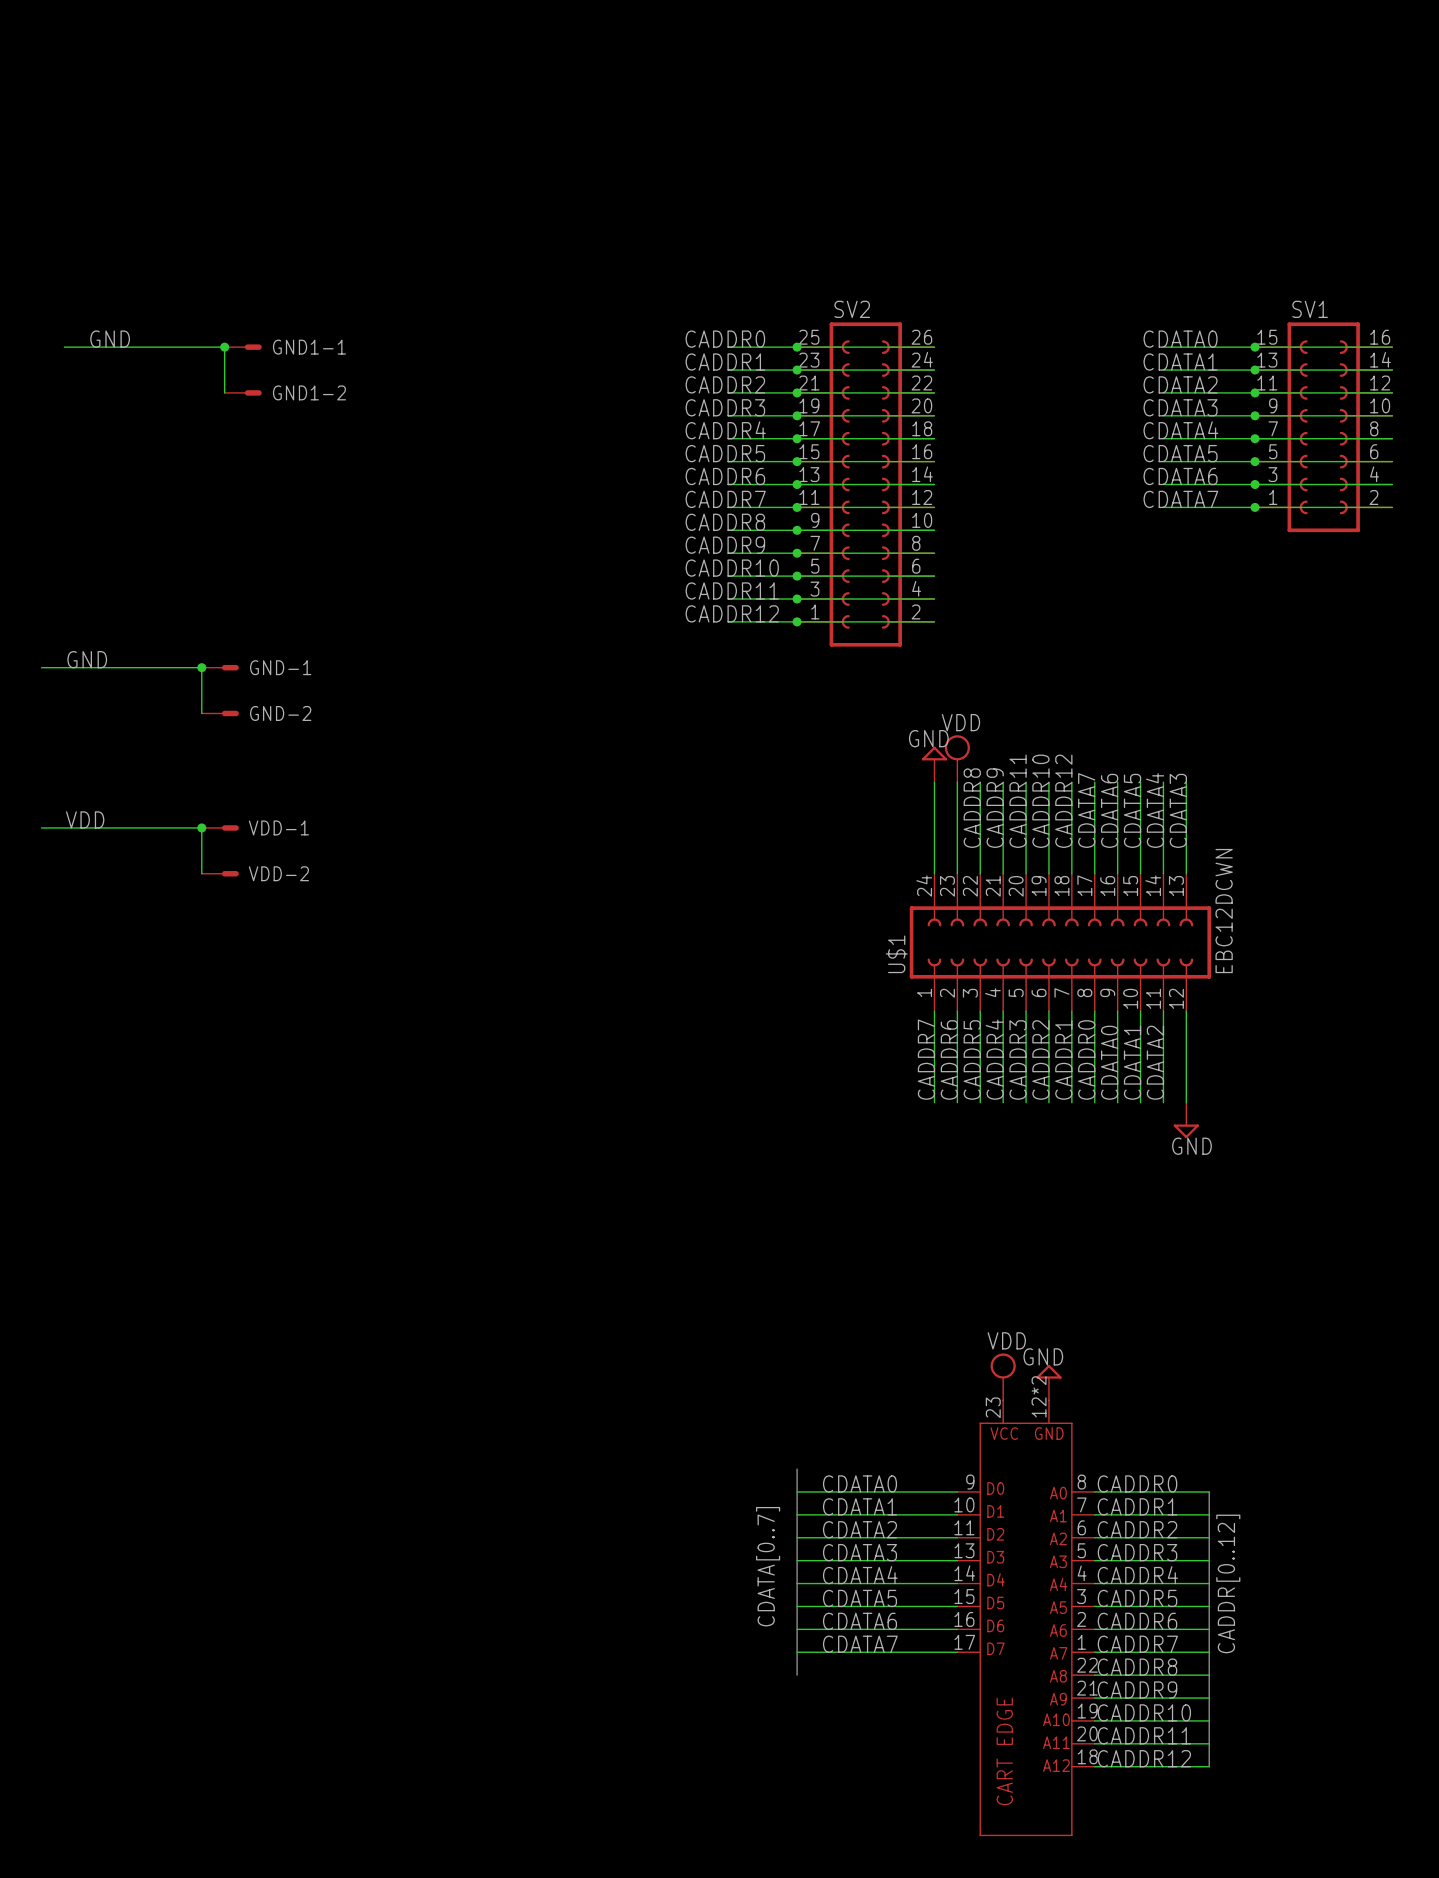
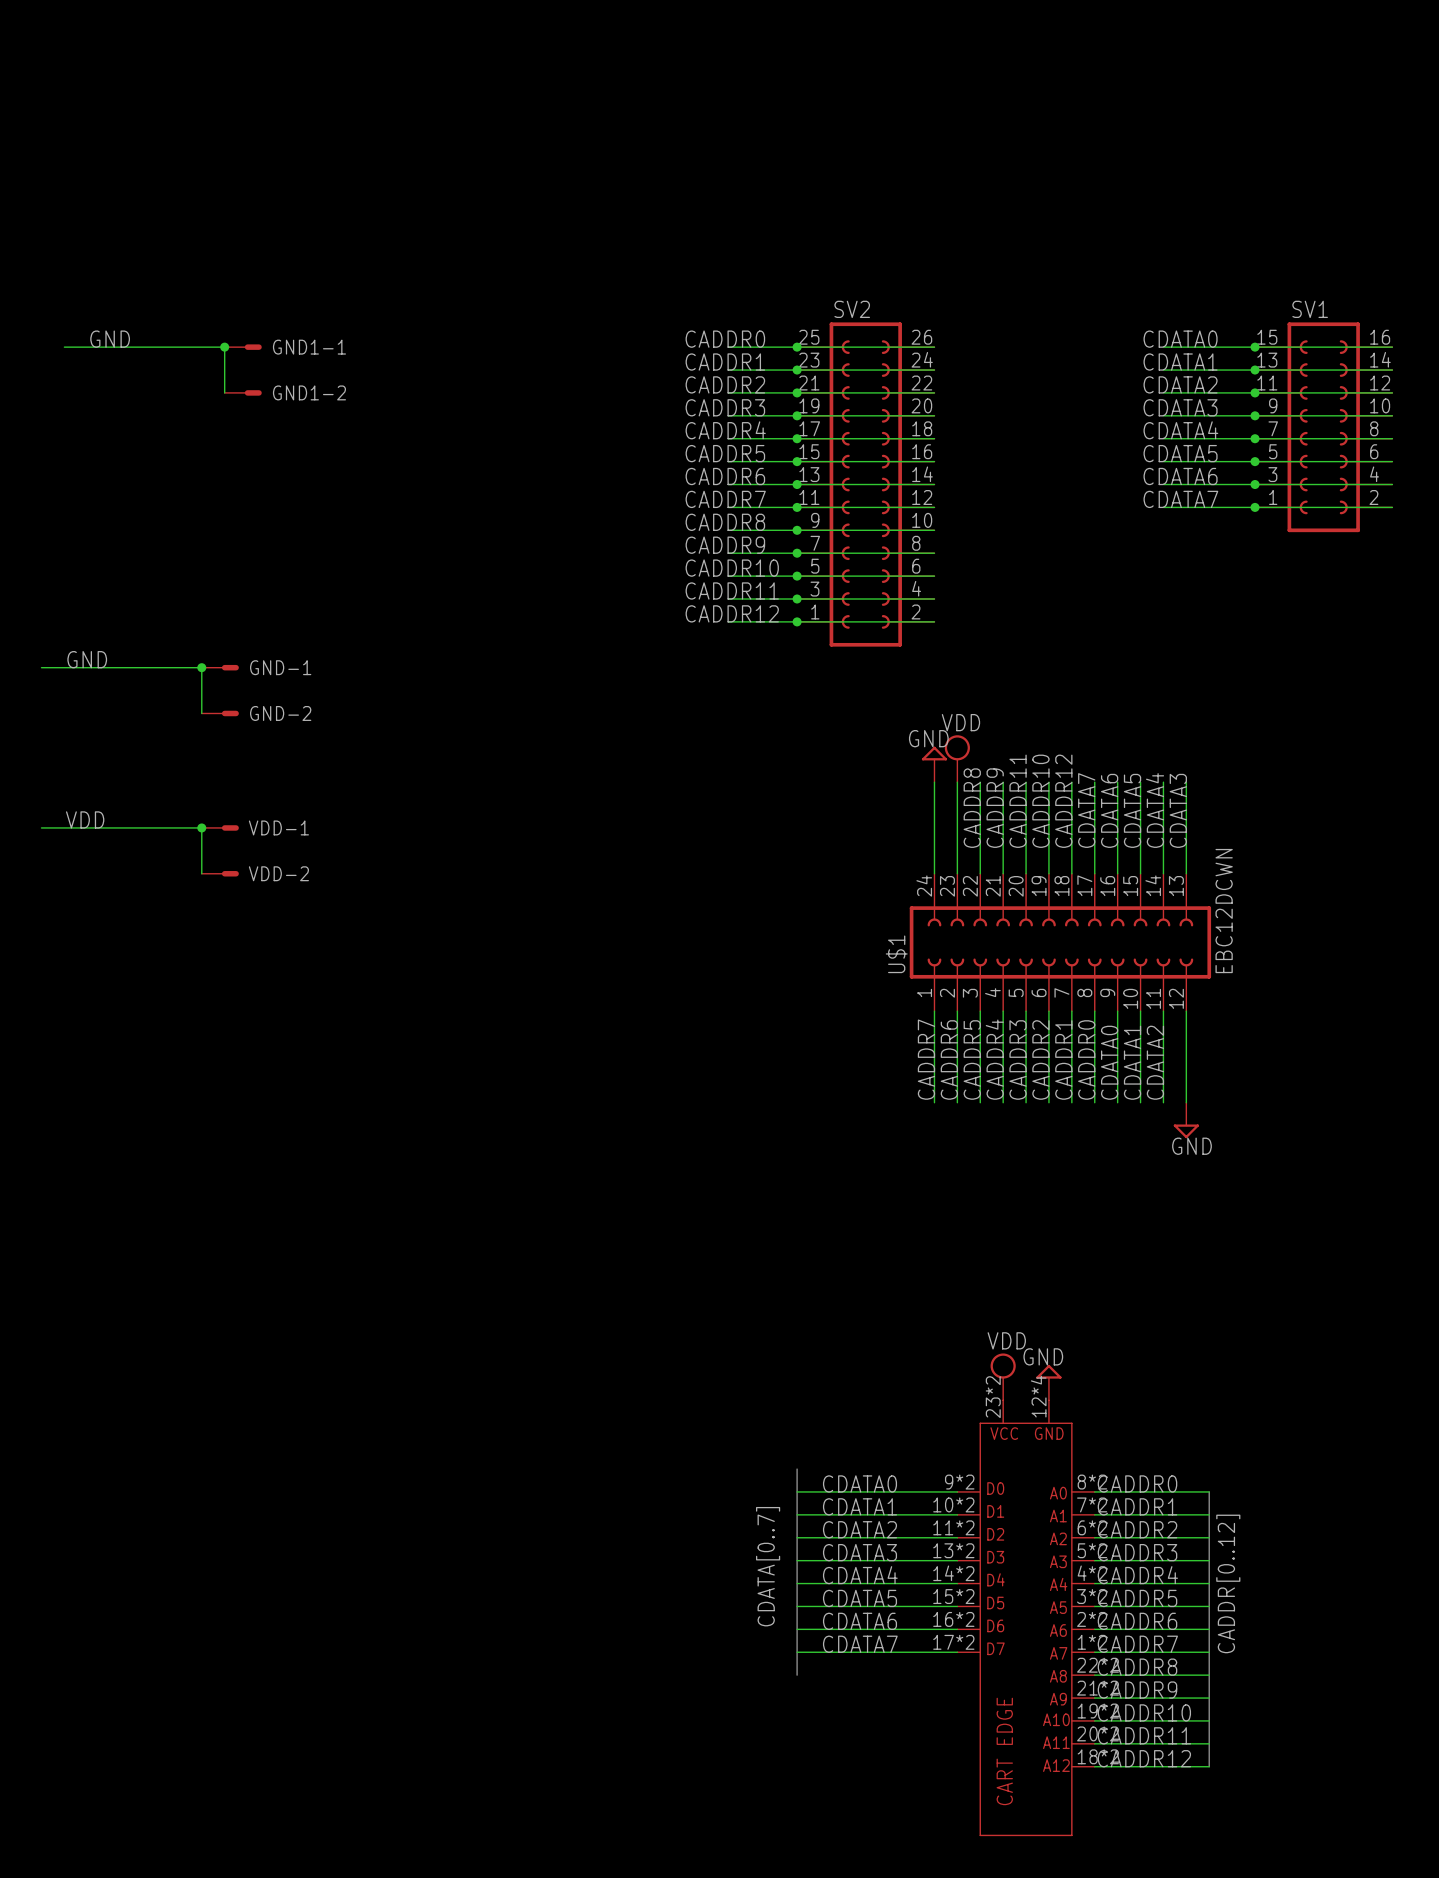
part symbol: [957, 1400, 1095, 1837] -> [957, 1400, 1095, 1837]

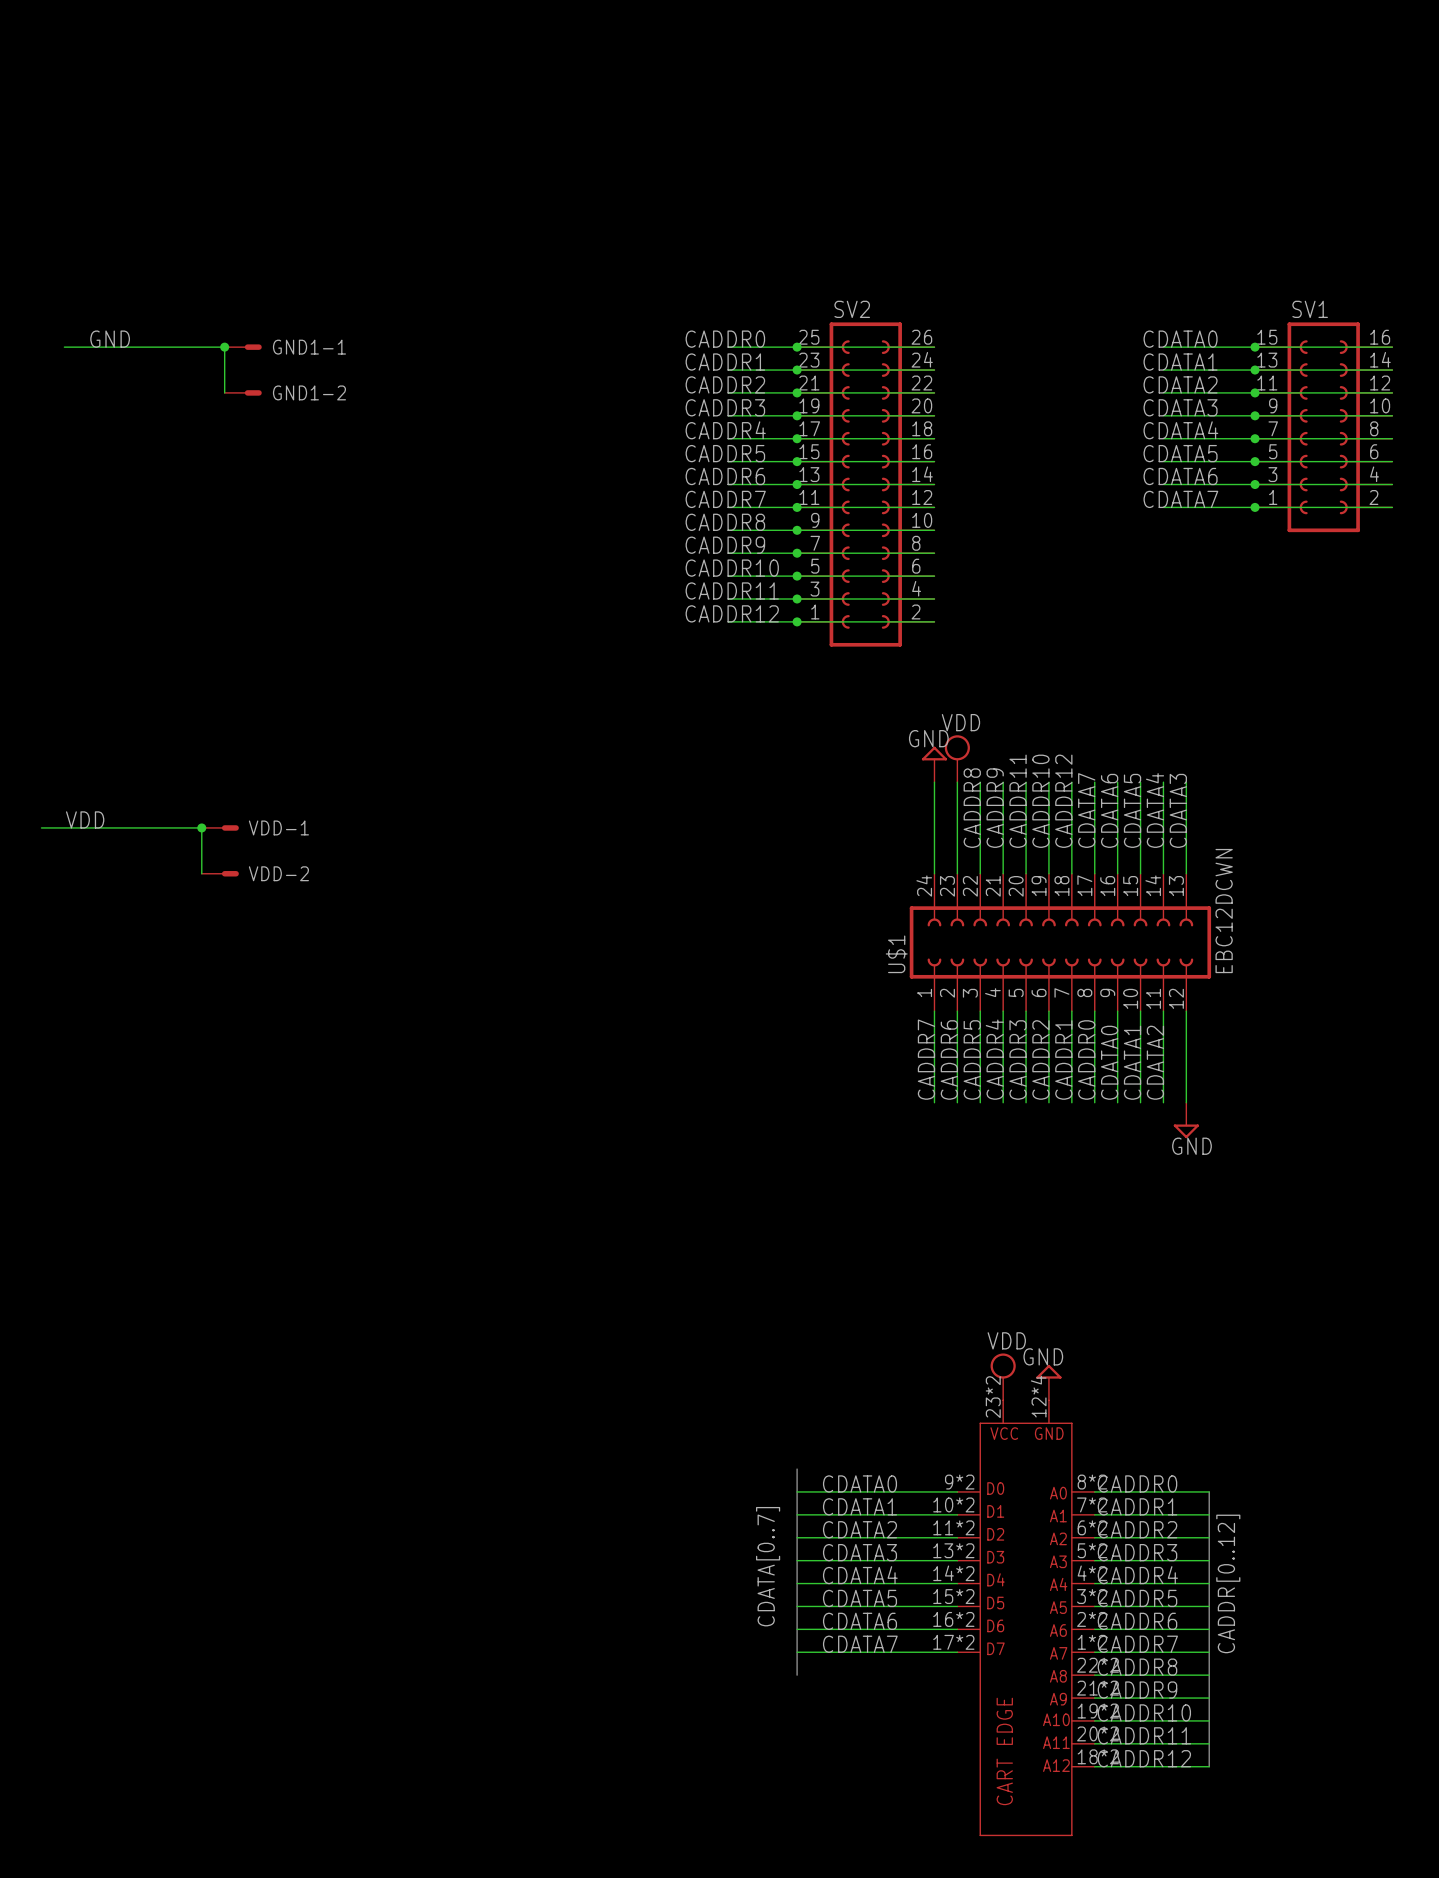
label: GND (87, 659) -> none
wire: (41, 667) (201, 667) (201, 713) -> none
junction: (201, 667) -> none
GND-1: (220, 667) -> none
GND-2: (220, 713) -> none

